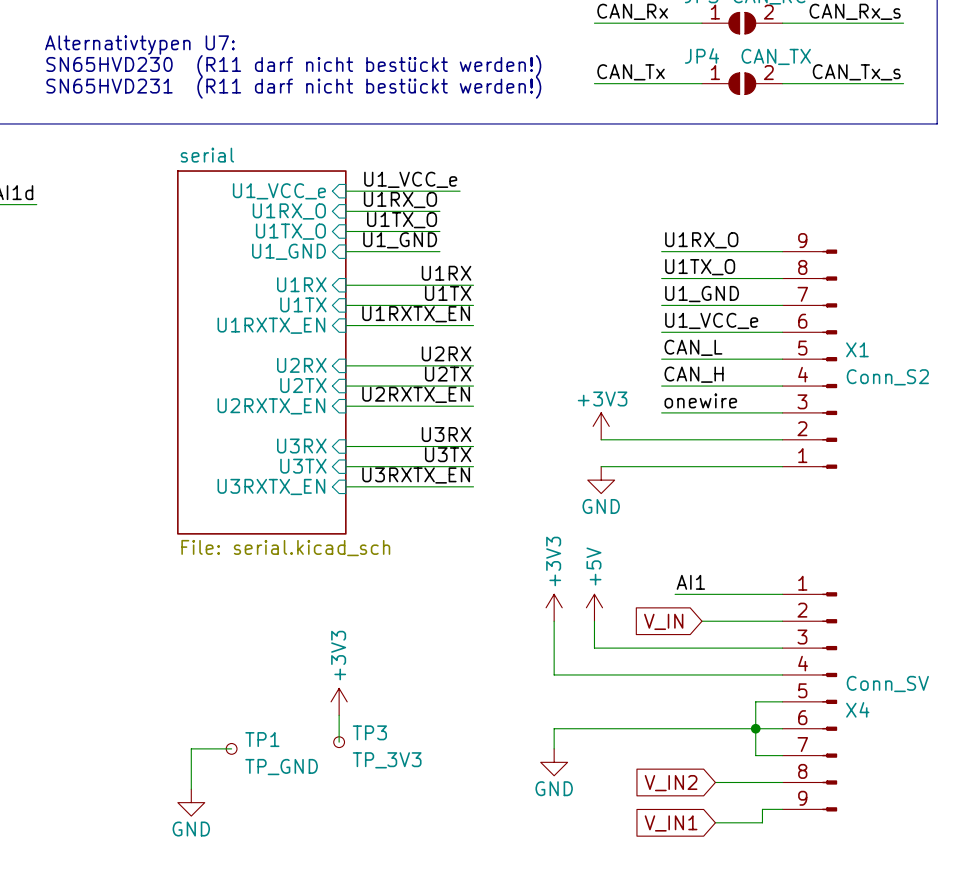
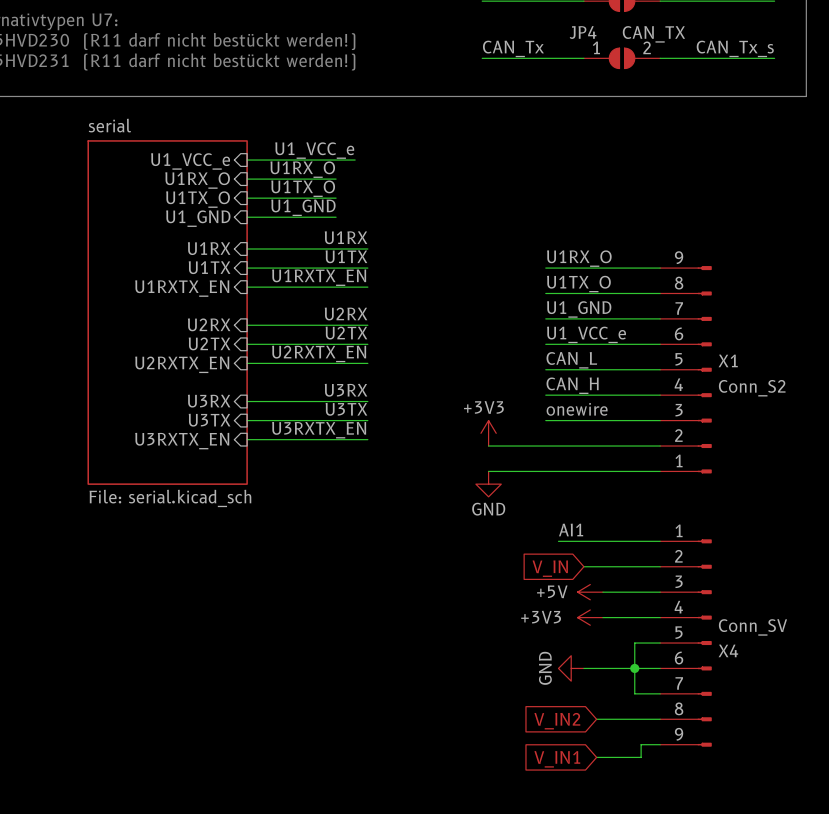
label: U1RX_O (701, 240) -> none
wire: (661, 251) (782, 251) -> none
label: U1TX_O (700, 267) -> none
wire: (661, 278) (782, 278) -> none
label: U1_GND (702, 294) -> U1RX_O (579, 258)
label: U1_VCC_e (711, 320) -> U1TX_O (578, 284)
label: CAN_L (693, 347) -> U1_GND (579, 309)
X1 position: (809, 359) -> (685, 369)
label: CAN_H (694, 374) -> U1_VCC_e (586, 334)
label: onewire (700, 400) -> CAN_L (571, 360)
power symbol: +3V3 (601, 426) -> none
label: none -> CAN_H (572, 385)
wire: (601, 439) (661, 439) -> none
label: none -> onewire (577, 409)
wire: (601, 466) (661, 466) -> none
power symbol: GND (601, 480) -> +3V3 (488, 433)
wire: none -> (488, 446) (660, 446)
wire: none -> (488, 471) (660, 471)
power symbol: none -> GND (488, 484)
power symbol: +3V3 (554, 607) -> none
power symbol rotation: 0° (594, 607) -> 90° counterclockwise (590, 592)
power symbol position: +5V (594, 607) -> +5V (590, 592)
wire: (554, 621) (554, 674) (722, 674) -> none
wire: (594, 621) (594, 648) (722, 648) -> none
power symbol: none -> +3V3 (590, 617)
power symbol: +3V3 (339, 701) -> none
wire: (339, 715) (339, 742) -> none
power symbol: none -> GND (571, 668)
wire: (701, 728) (554, 728) (554, 748) -> none
TP3: TP_3V3 (339, 742) -> none
wire: (231, 748) (191, 748) (191, 789) -> none
TP1: TP_GND (231, 748) -> none
power symbol: GND (554, 762) -> none
power symbol: GND (191, 802) -> none

